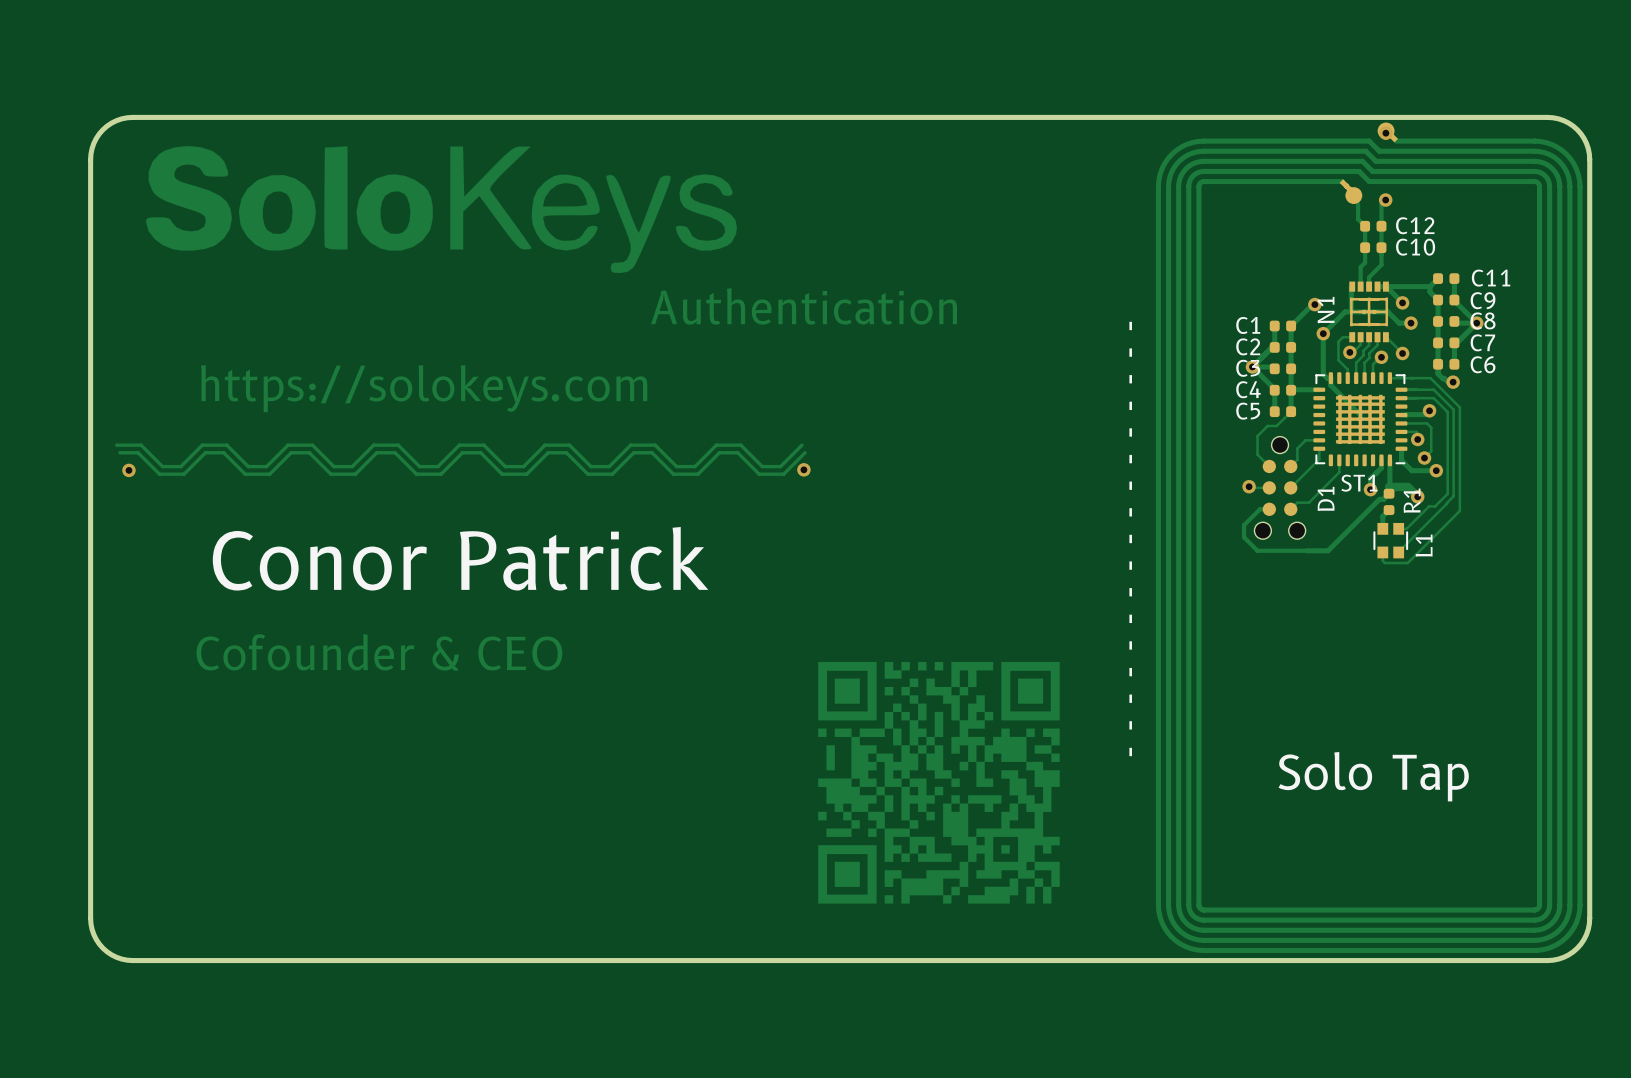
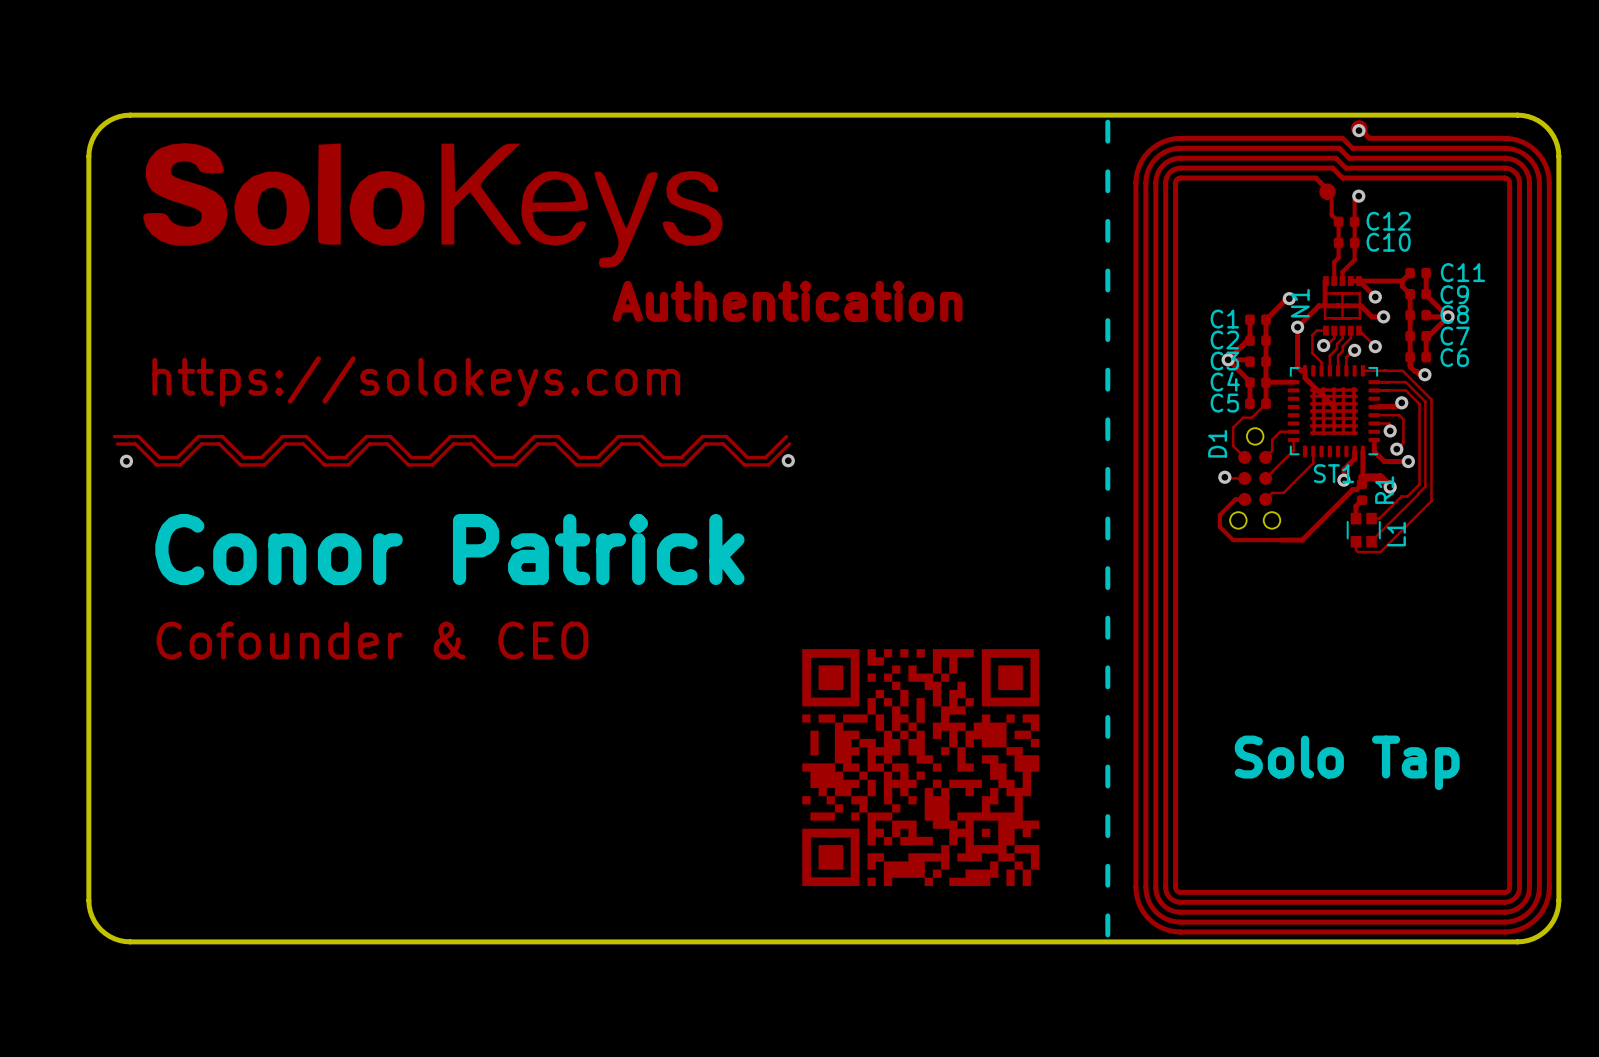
D1 name position: D1 (1326, 498) -> D1 (1217, 443)

